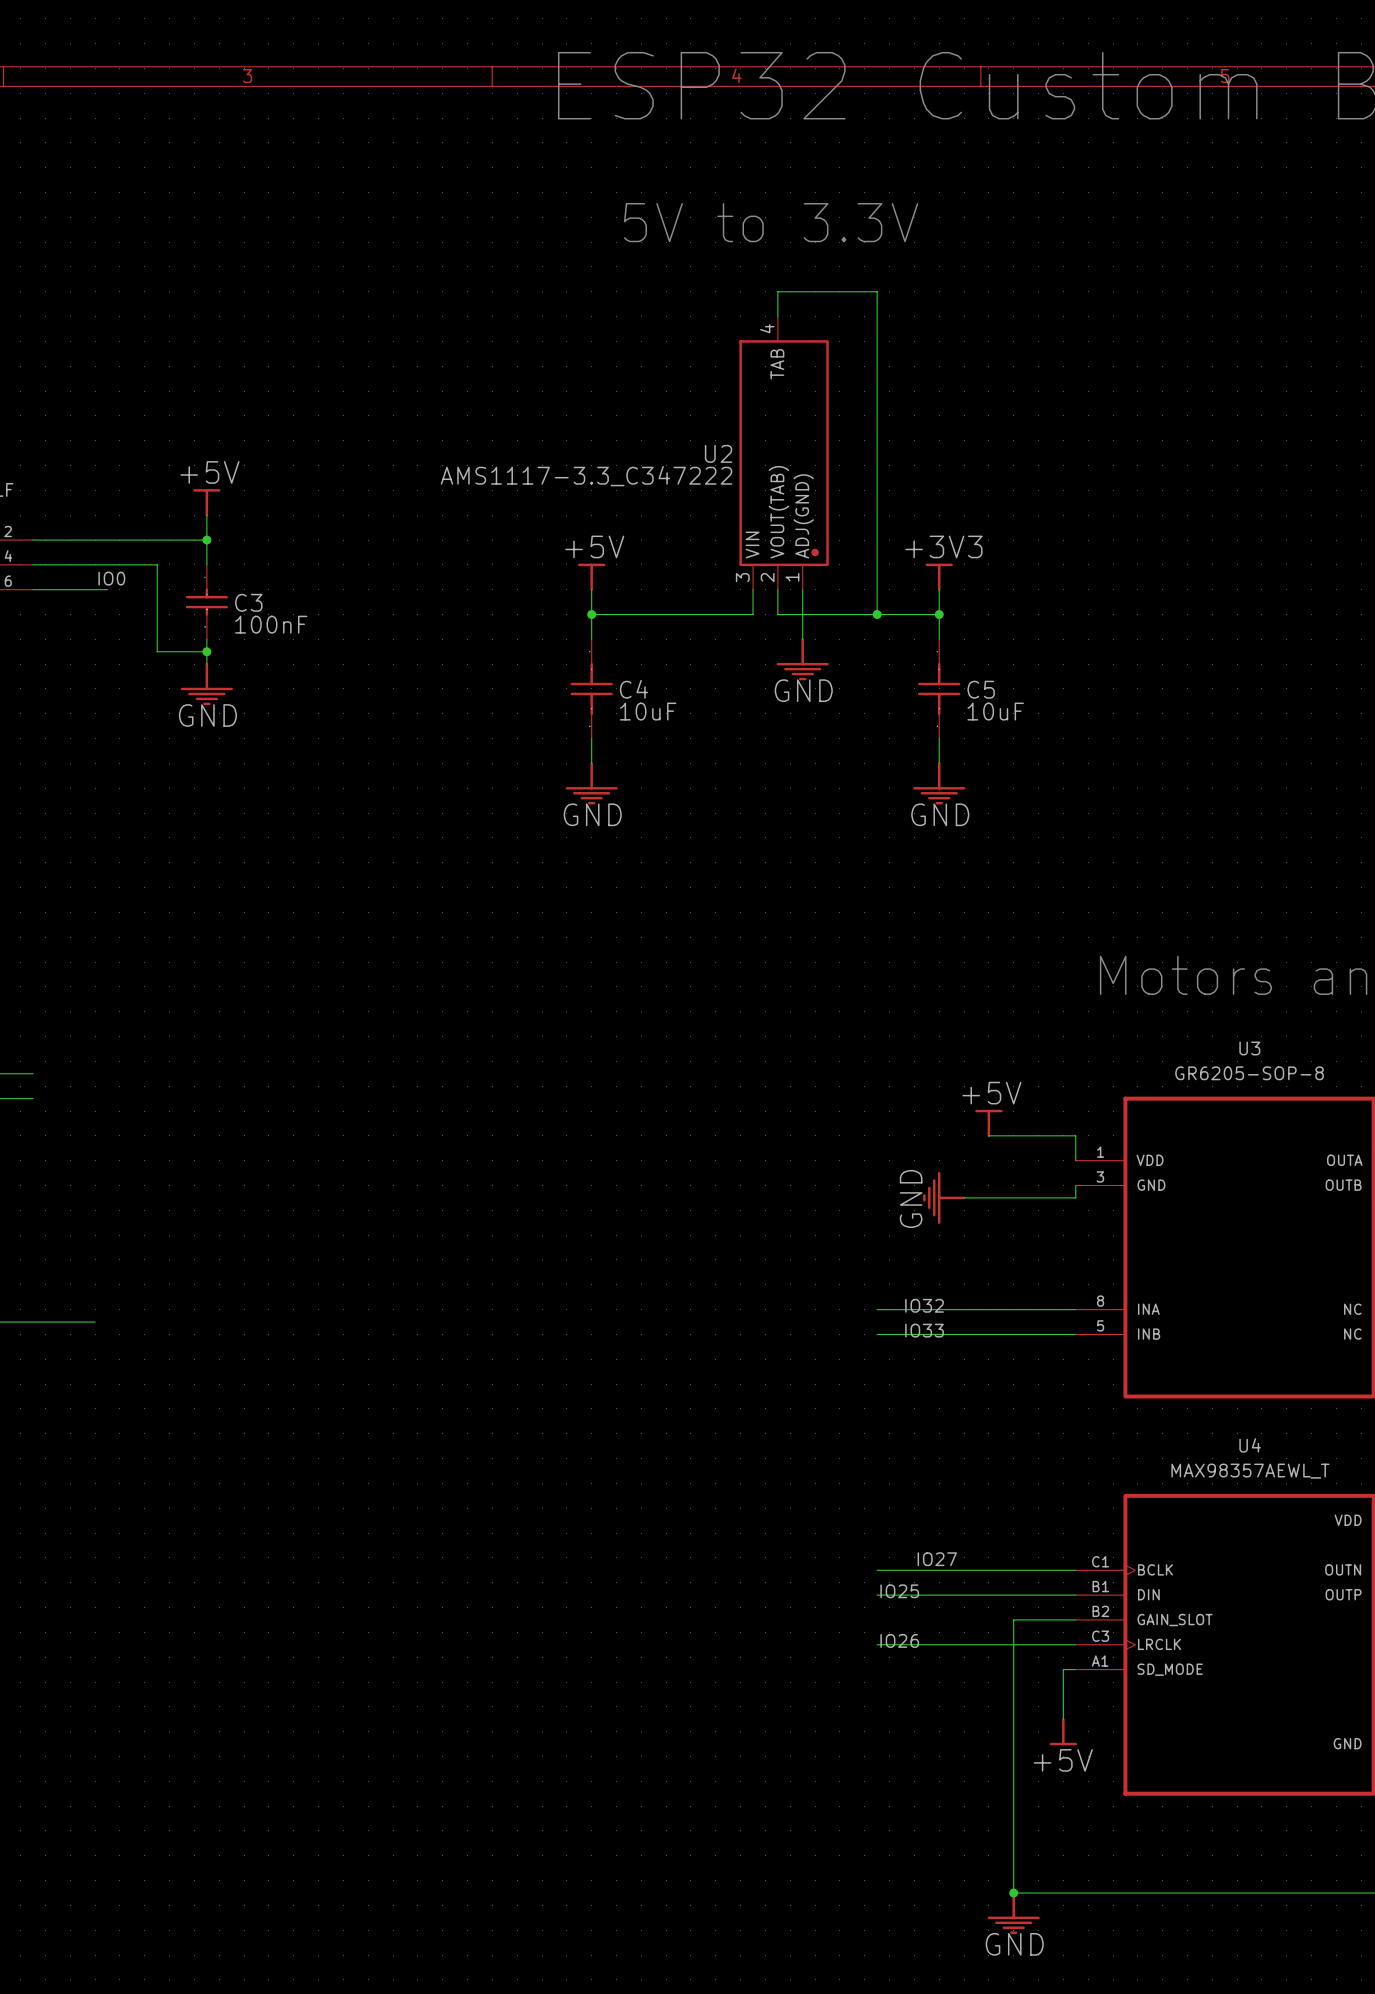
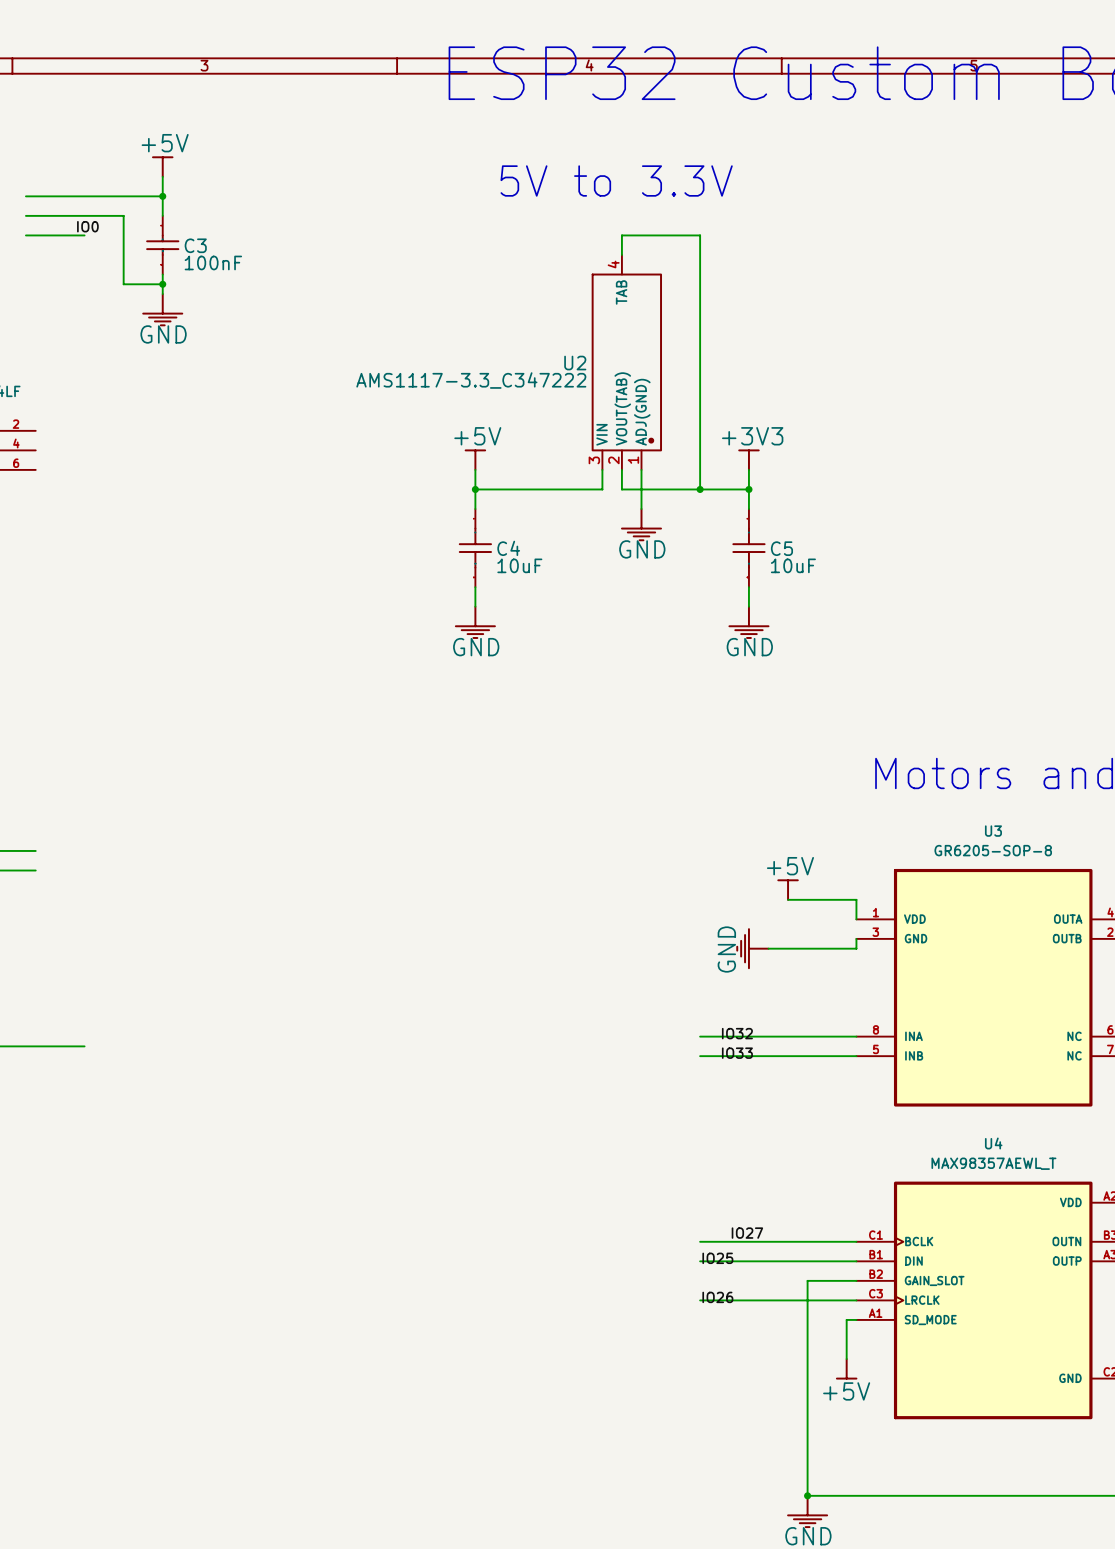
power symbol: none -> +5V (162, 167)
wire: none -> (162, 176) (162, 215)
wire: none -> (25, 196) (162, 196)
junction: none -> (162, 196)
wire: none -> (25, 215) (123, 215) (123, 284) (162, 284)
label: none -> IO0 (87, 226)
wire: none -> (25, 235) (84, 235)
wire: none -> (162, 274) (162, 294)
junction: none -> (162, 284)
power symbol: none -> GND (162, 309)
power symbol: +5V (206, 502) -> none
wire: (206, 515) (206, 564) -> none
wire: (33, 540) (206, 540) -> none
junction: (206, 540) -> none
wire: (33, 564) (157, 564) (157, 651) (206, 651) -> none
label: IO0 (111, 578) -> none
wire: (33, 589) (107, 589) -> none
C3 position: (206, 602) -> (162, 245)
wire: (206, 639) (206, 664) -> none
junction: (206, 651) -> none
power symbol: GND (206, 684) -> none

